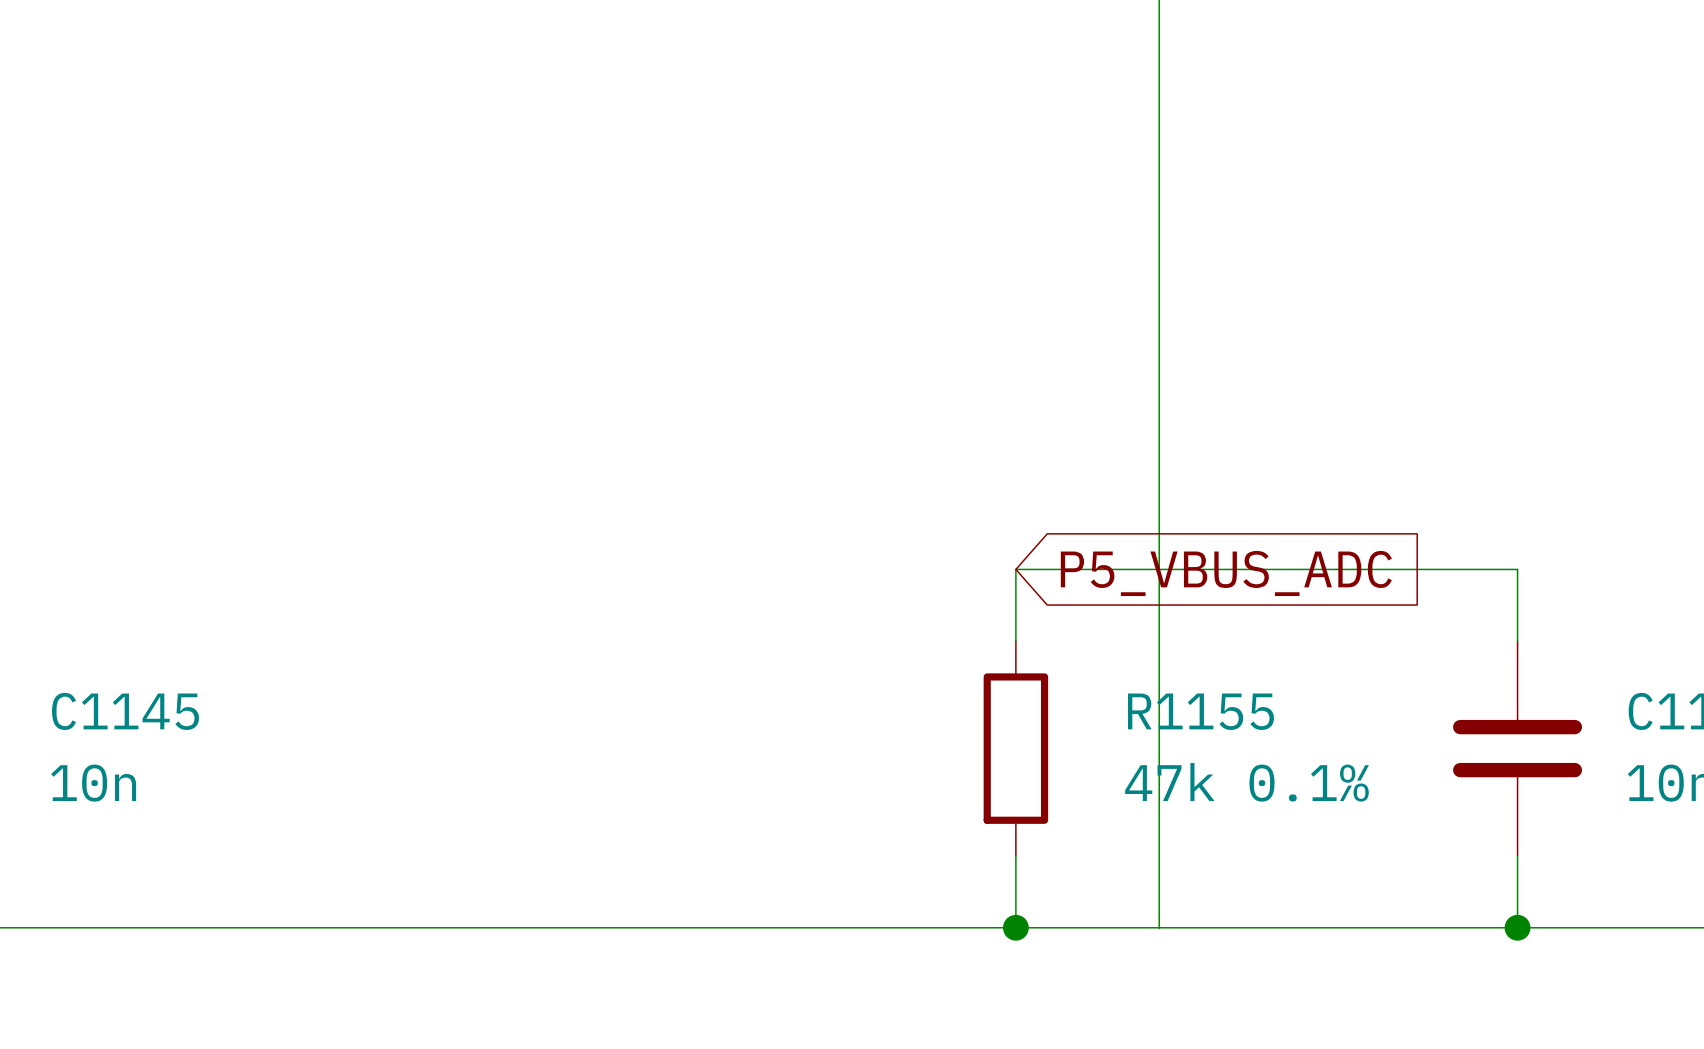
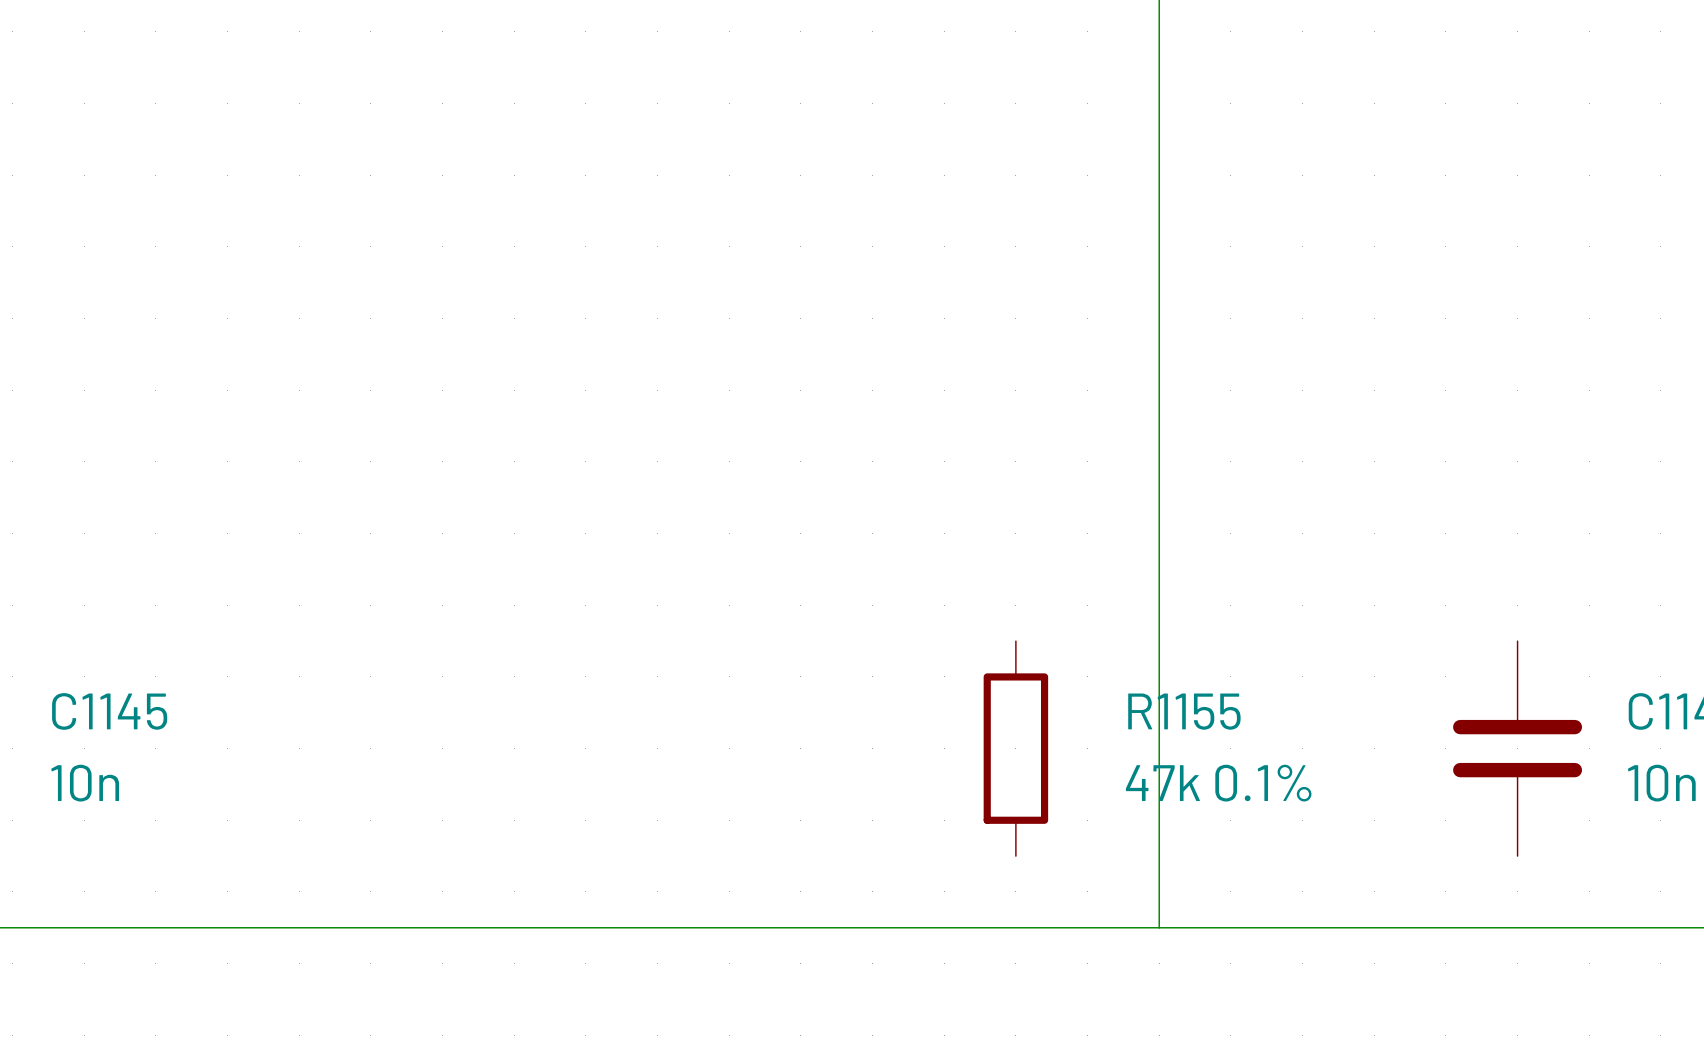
global label: P5_VBUS_ADC (1226, 573) -> none
wire: (1015, 641) (1015, 569) (1517, 569) (1517, 641) -> none
wire: (1015, 856) (1015, 927) -> none
wire: (1517, 856) (1517, 927) -> none
junction: (1015, 927) -> none
junction: (1517, 927) -> none

